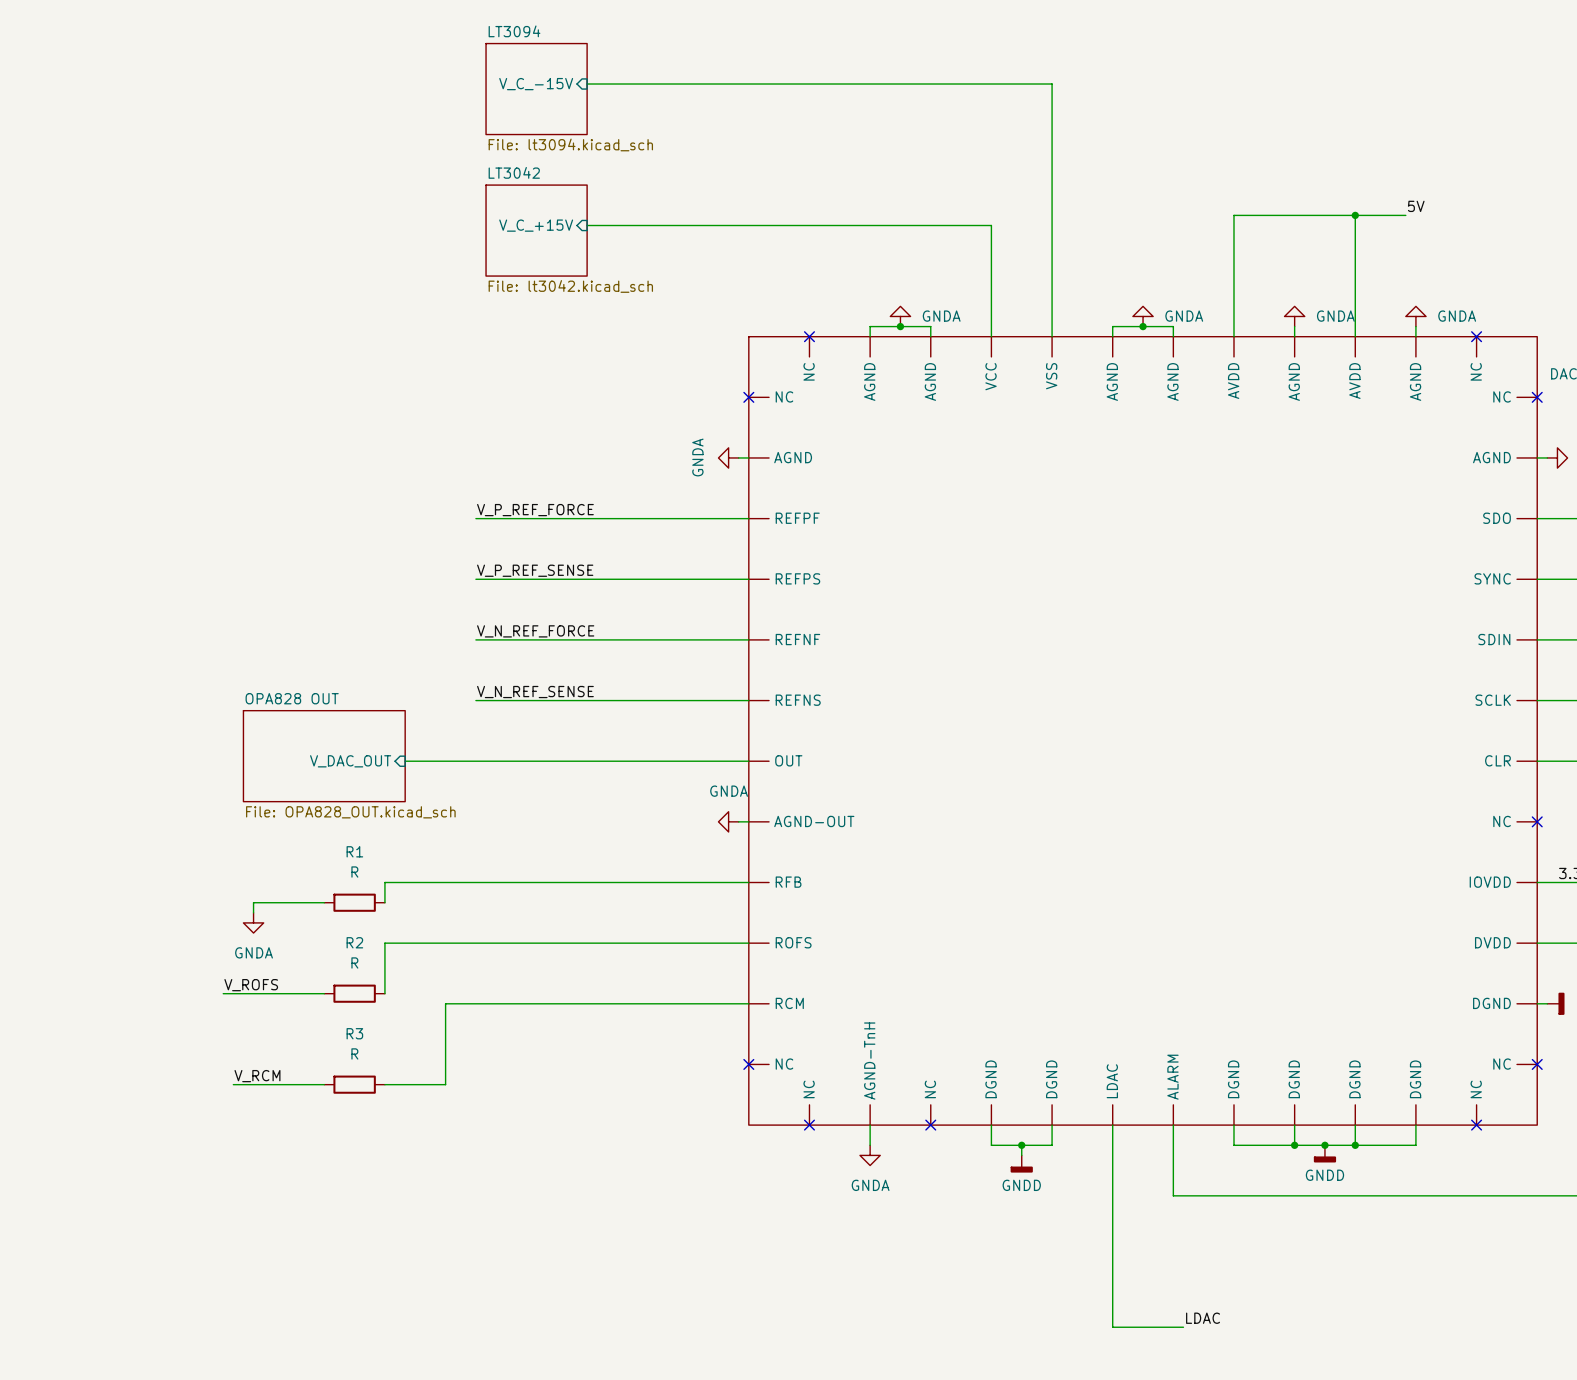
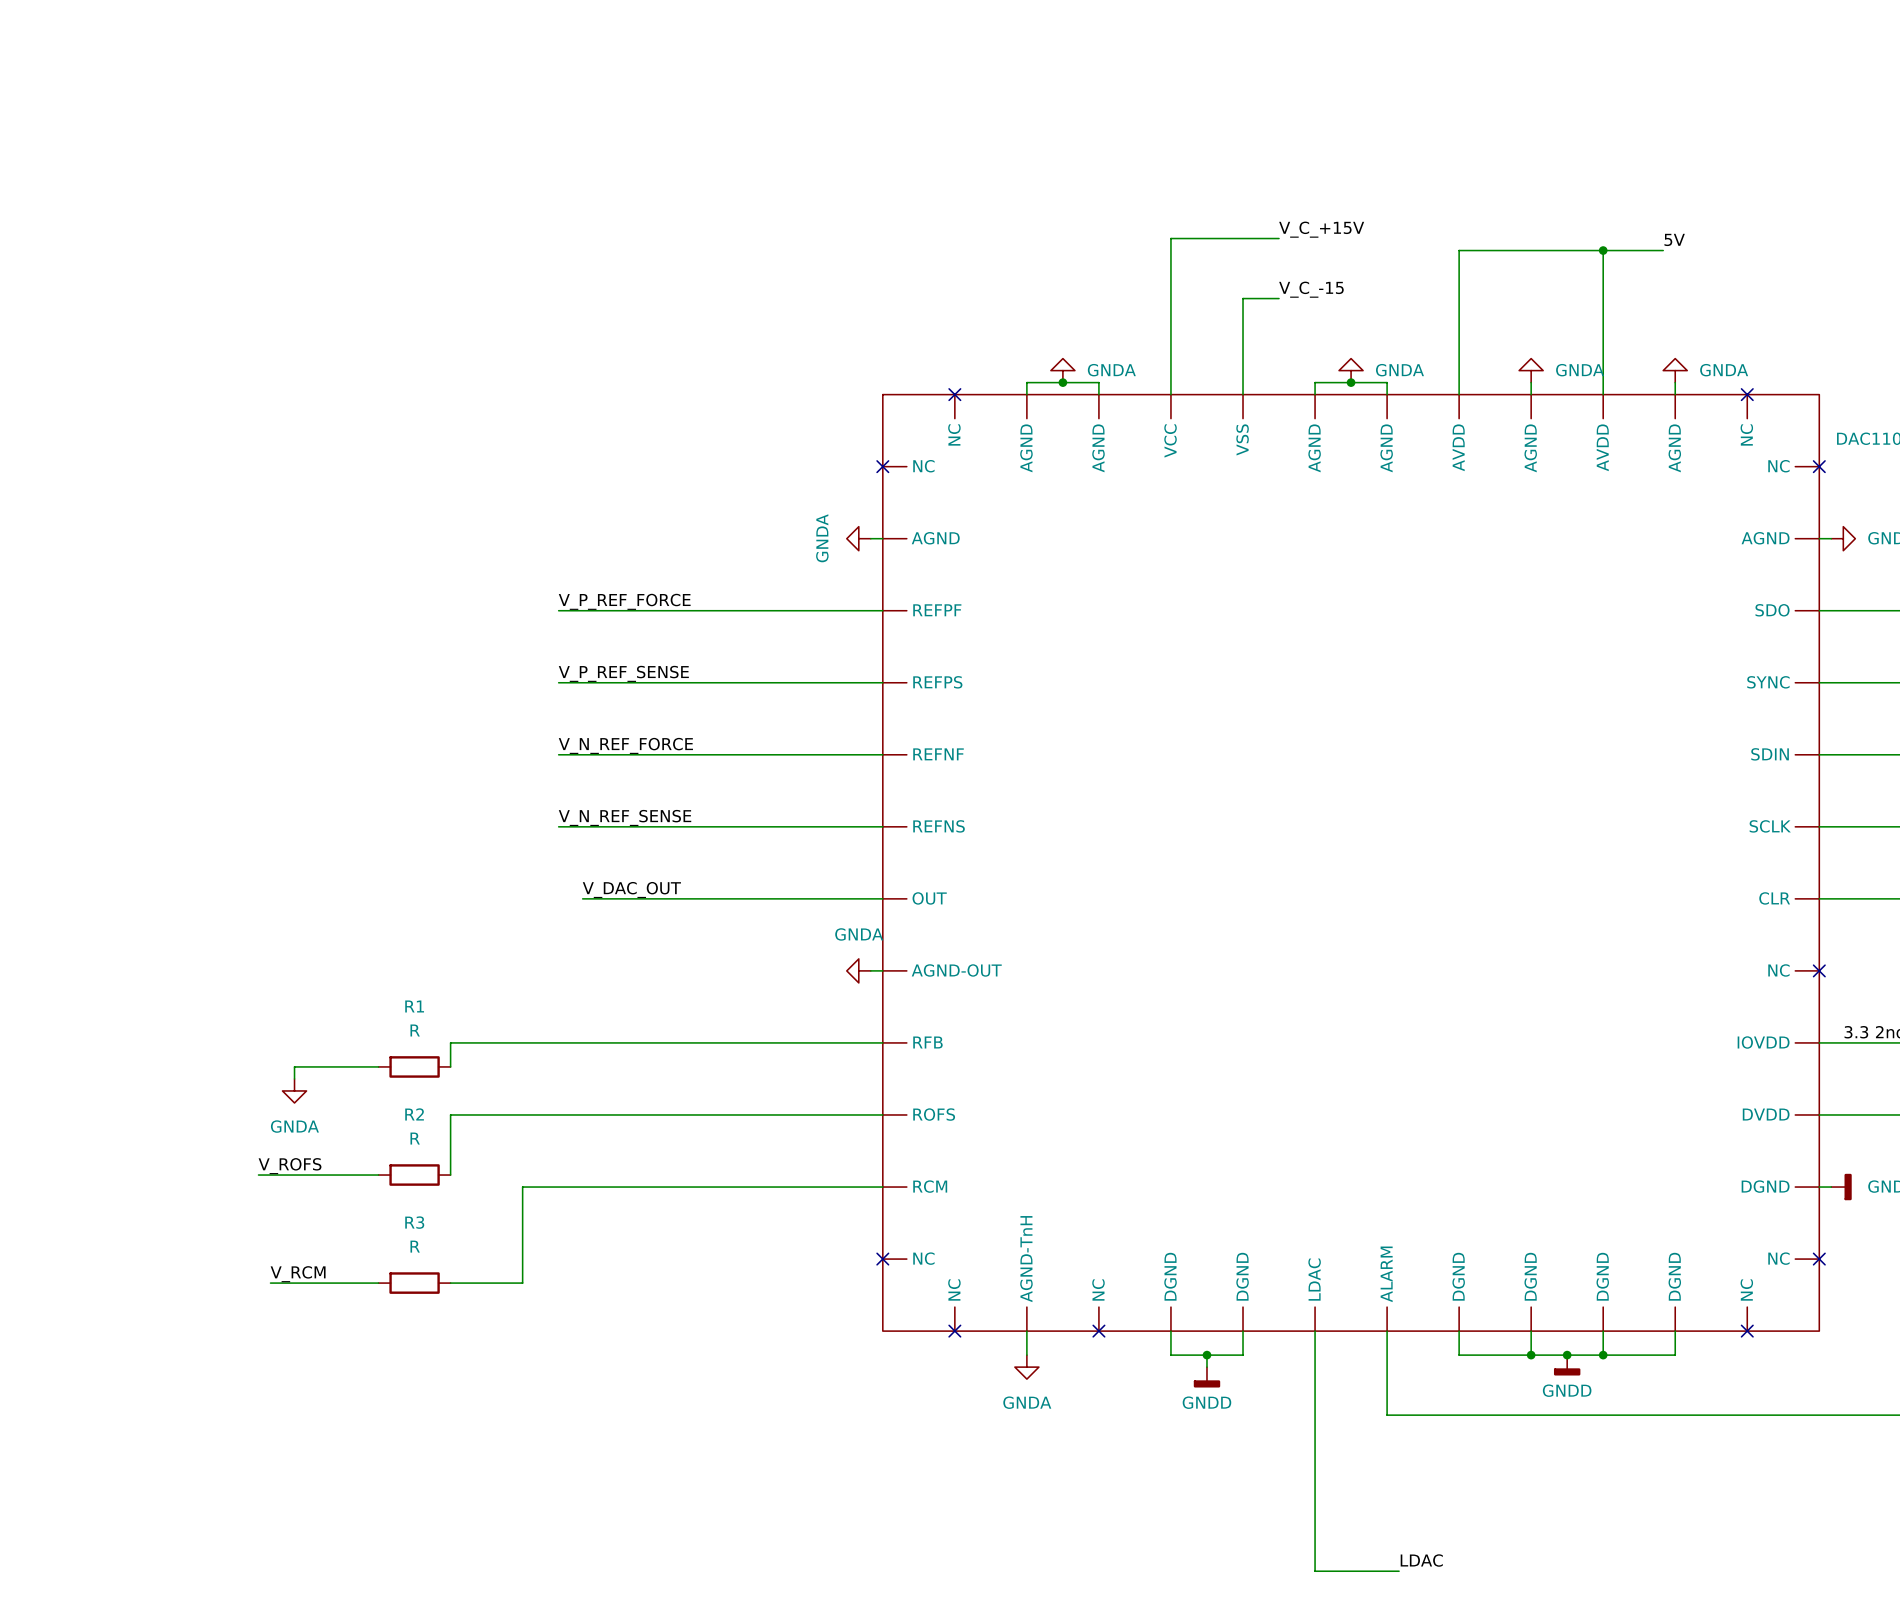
sheet pin: V_C_-15V (536, 84) -> none
wire: (587, 84) (1052, 84) (1052, 255) -> (1279, 298) (1243, 298)
sheet LT3094: File: lt3094.kicad_sch (536, 89) -> none
label: none -> V_C_+15V (1321, 229)
sheet pin: V_C_+15V (536, 225) -> none
wire: (587, 225) (991, 225) -> (1279, 238) (1170, 238) (1170, 262)
sheet LT3042: File: lt3042.kicad_sch (536, 230) -> none
label: none -> V_C_-15 (1311, 289)
label: none -> V_DAC_OUT (631, 889)
sheet OPA828 OUT: File: OPA828_OUT.kicad_sch (324, 756) -> none
sheet pin: V_DAC_OUT (350, 761) -> none
wire: (405, 761) (496, 761) -> none

